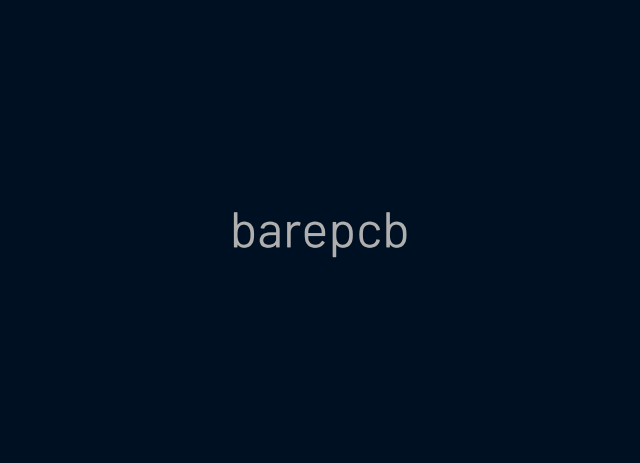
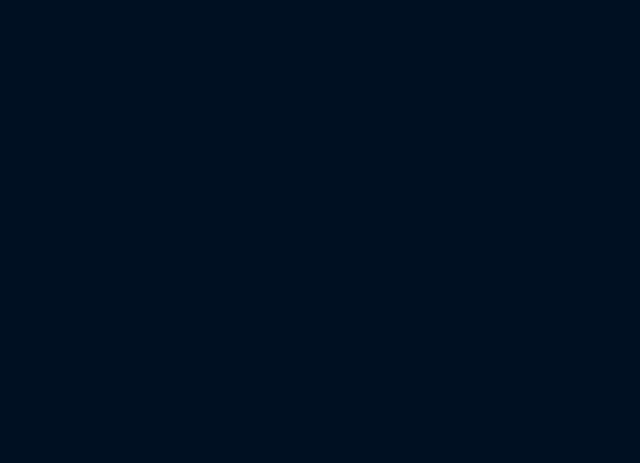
drawing: [233, 212, 407, 258] -> none

